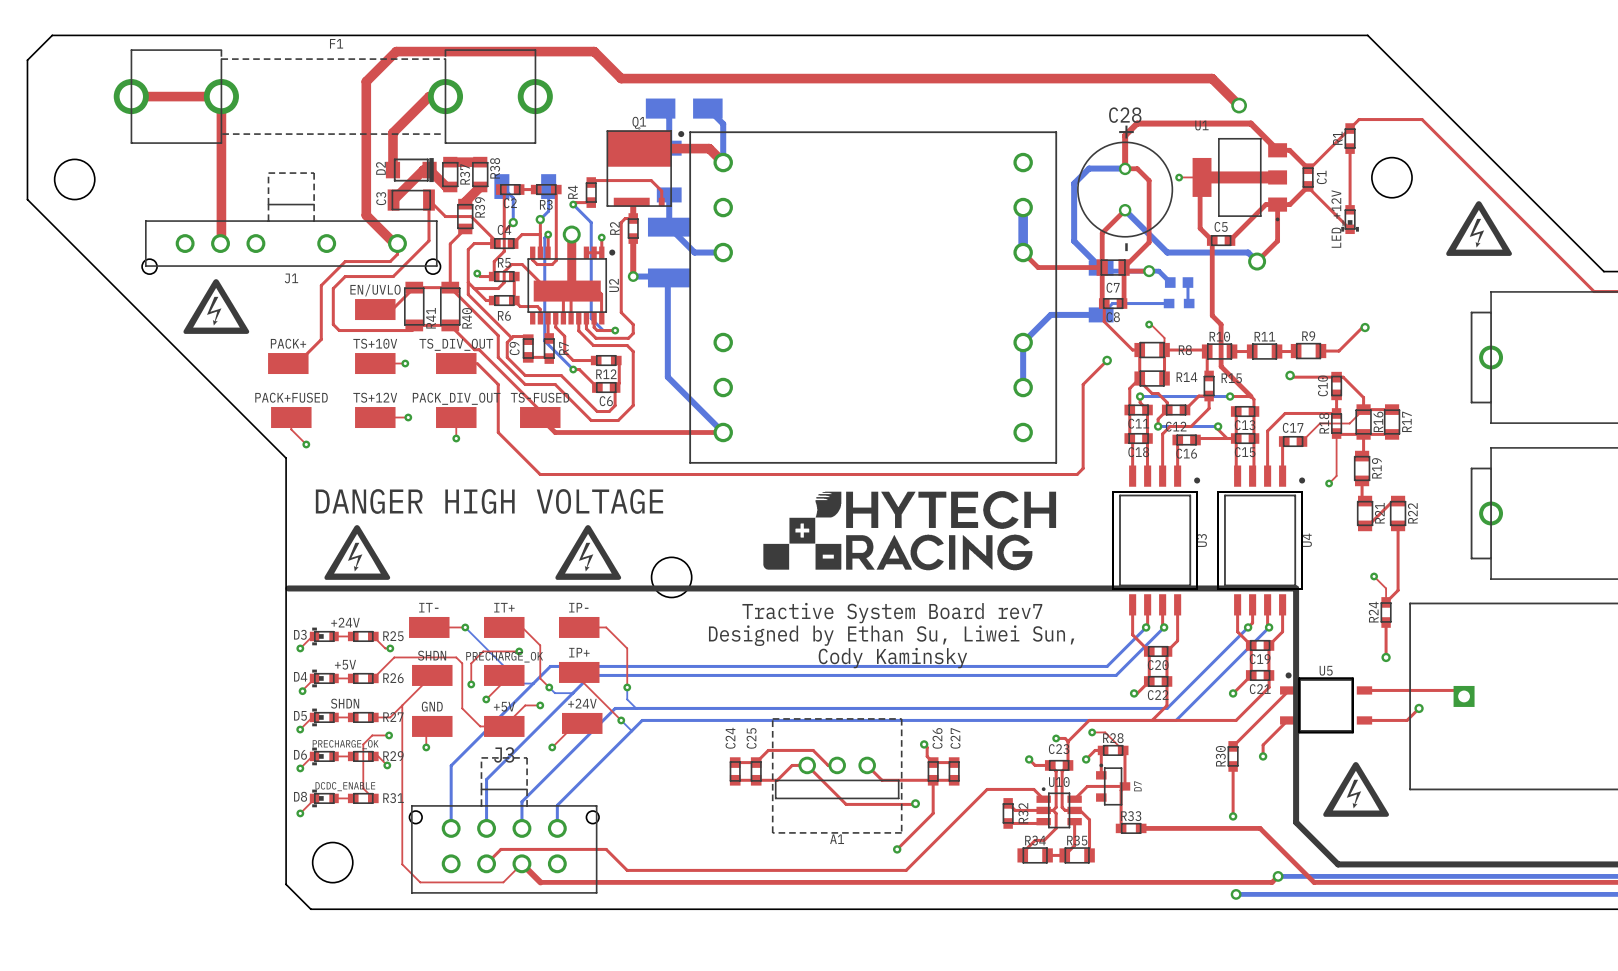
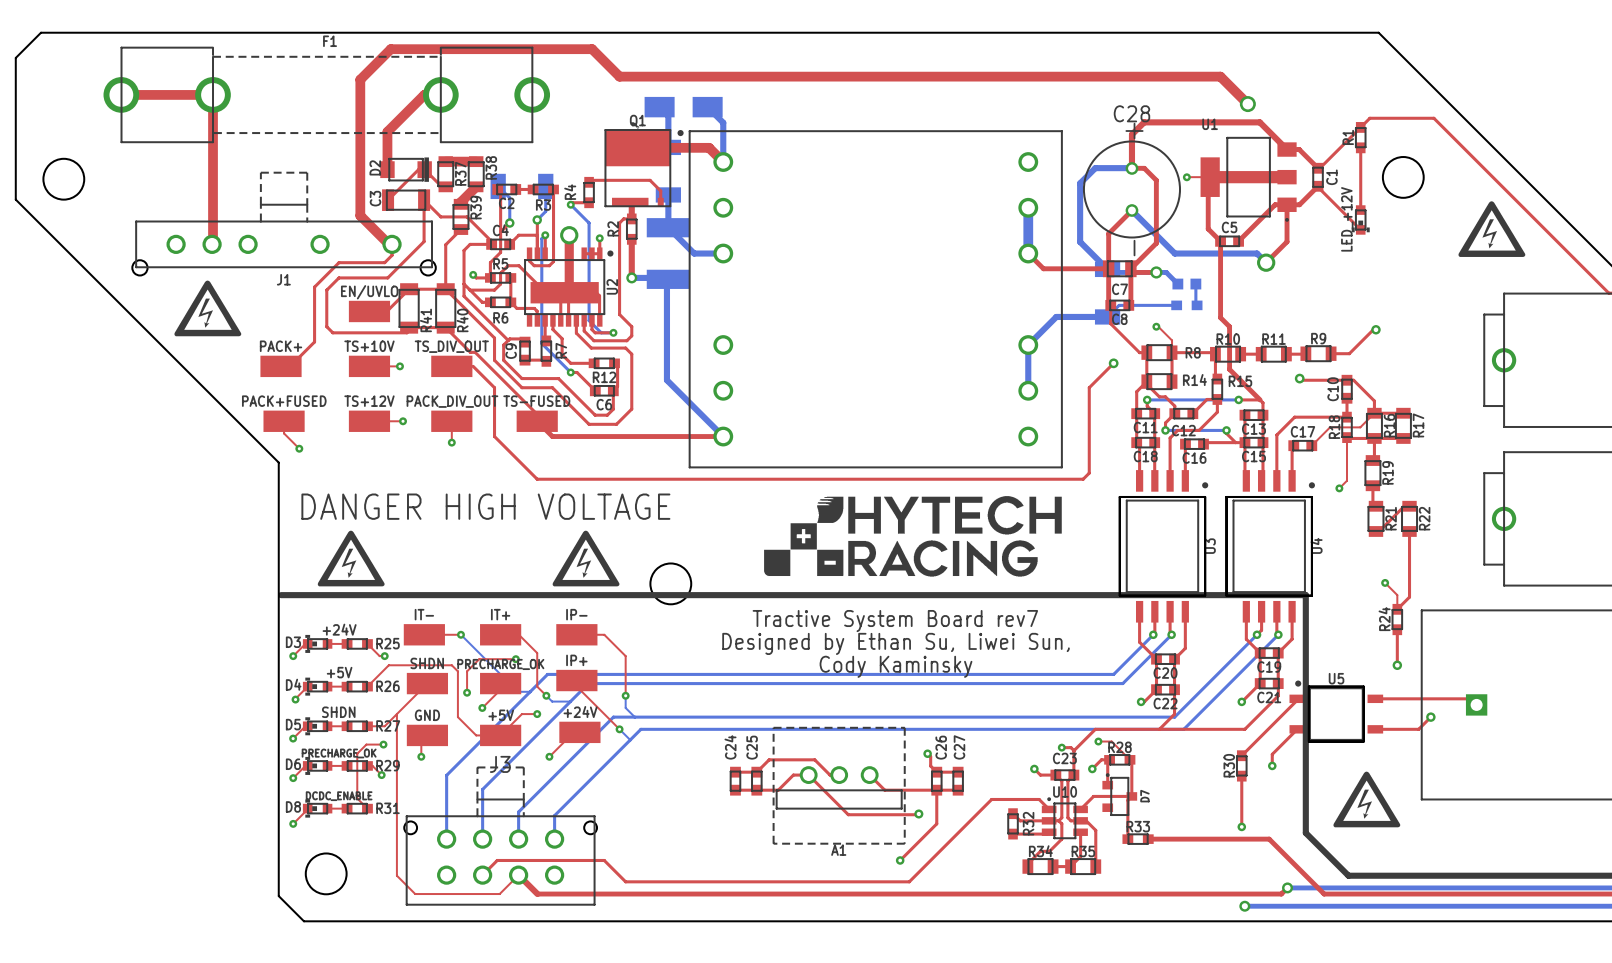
top track width: thick (450, 186) (446, 186) (429, 170) (423, 170) (393, 200) -> thin (445, 186) (441, 186) (424, 169) (418, 169) (388, 200)

